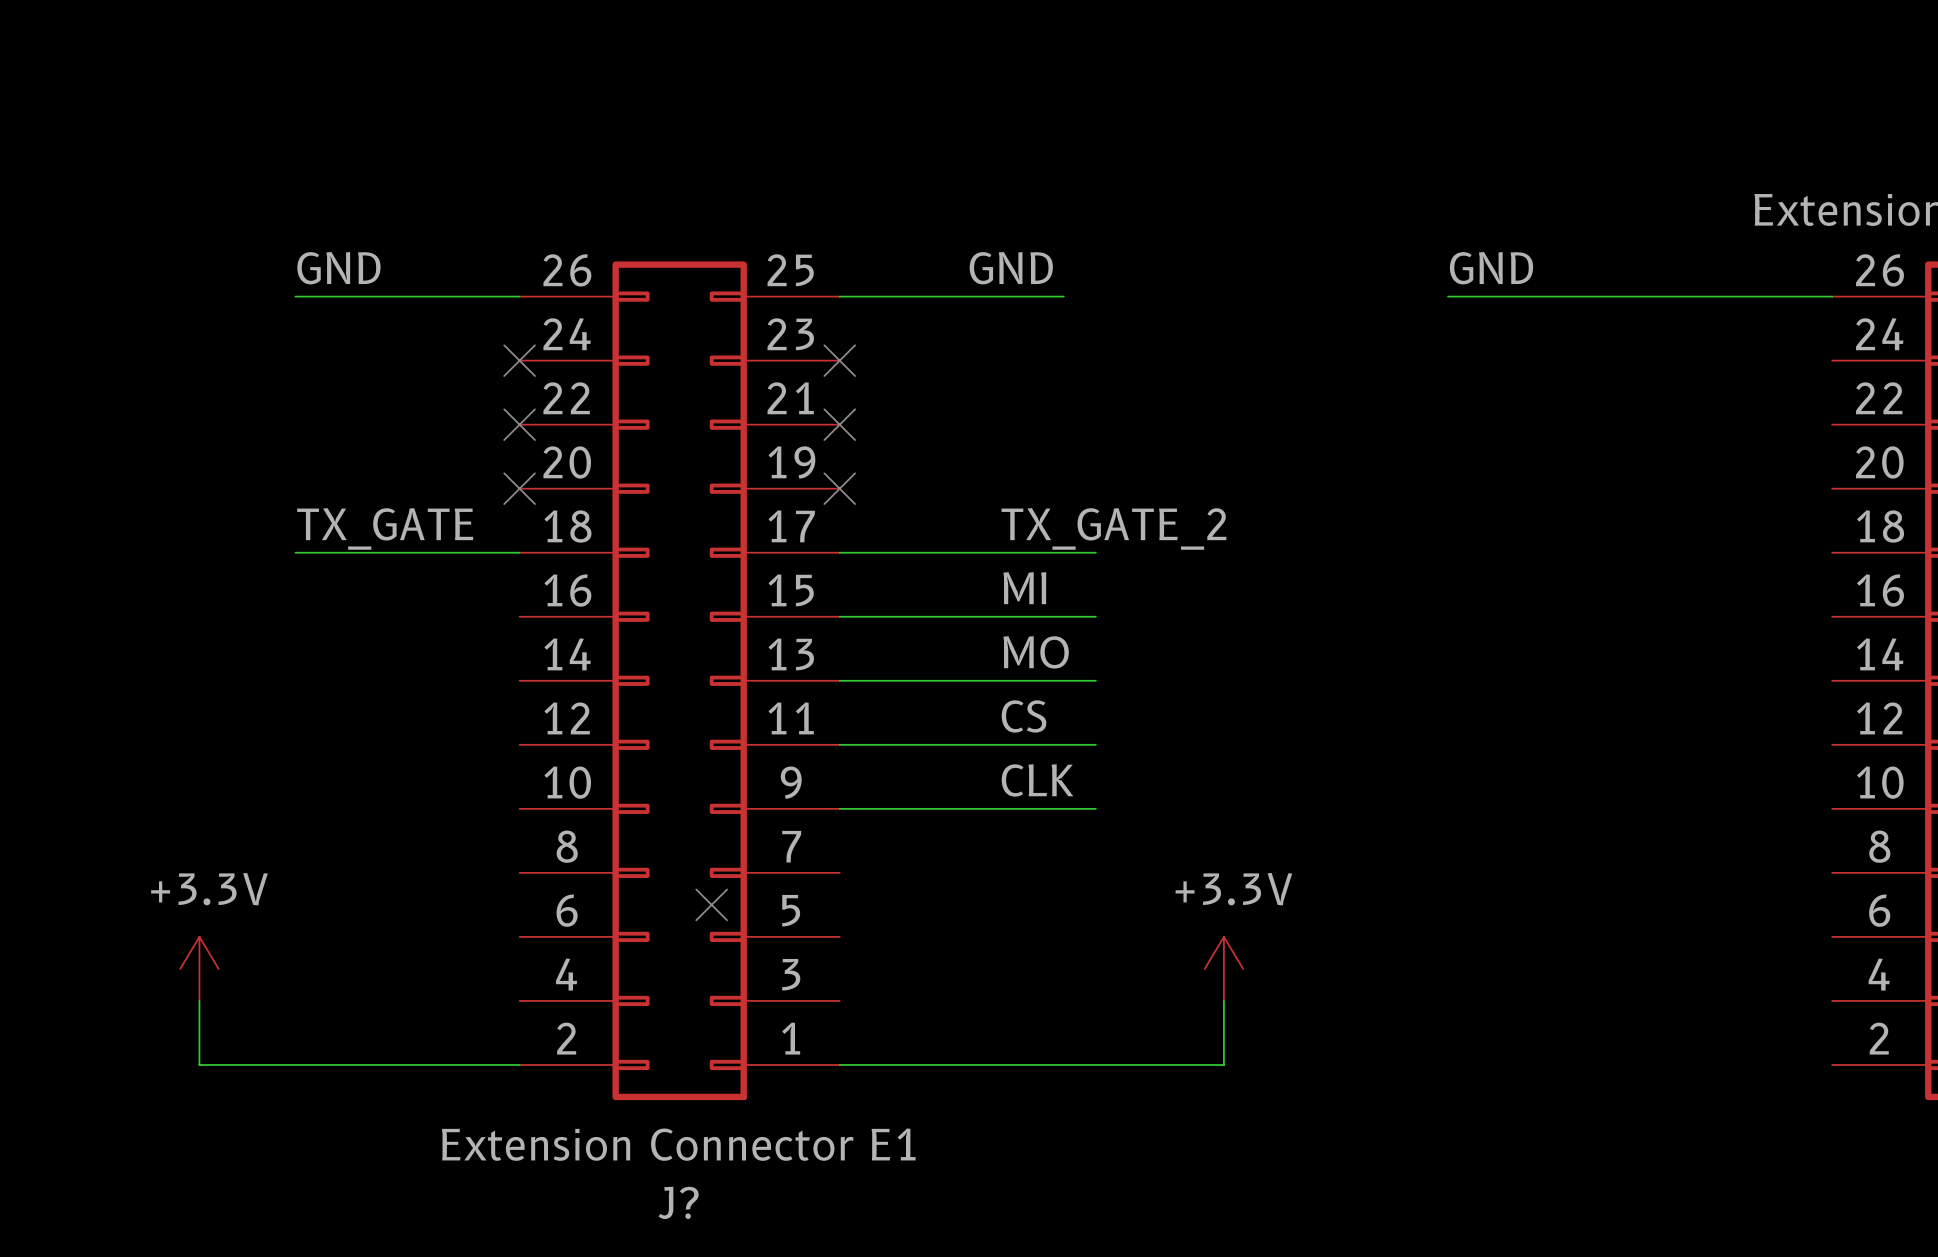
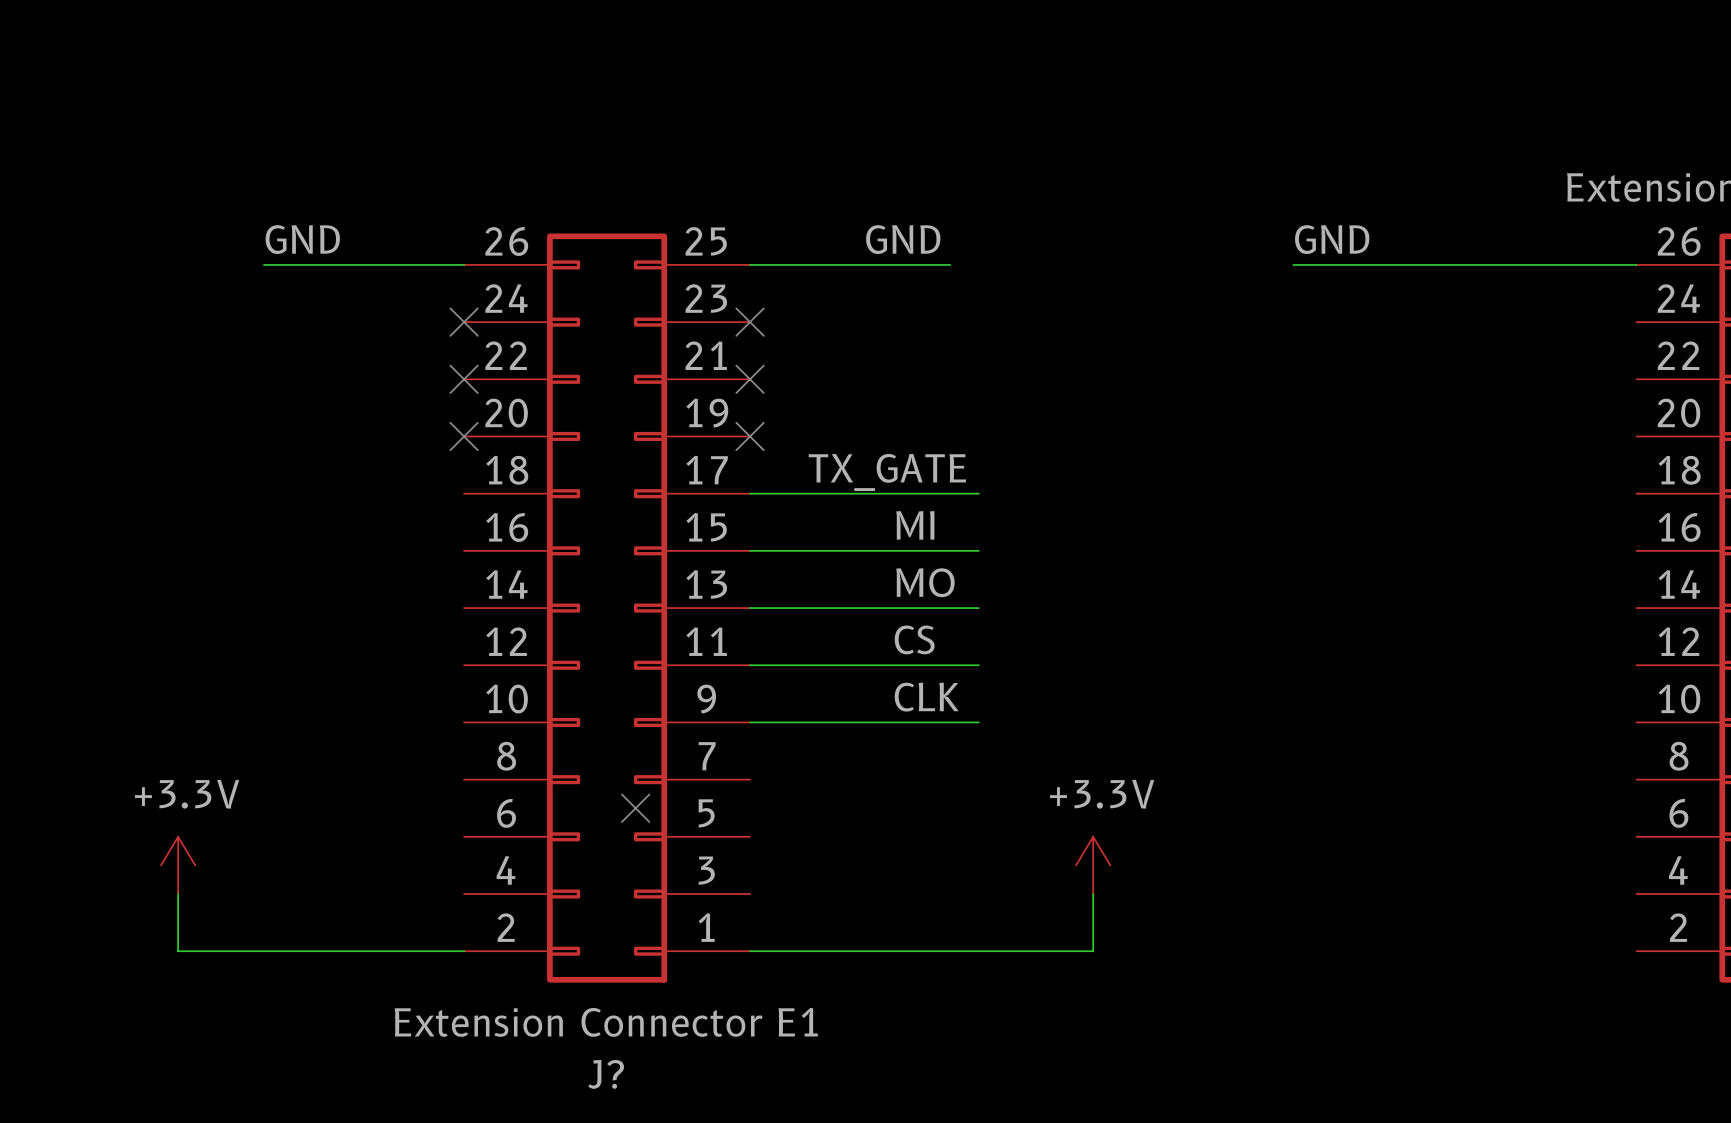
label position: TX_GATE (385, 528) -> TX_GATE (887, 472)
label: TX_GATE_2 (1113, 528) -> none
wire: (295, 552) (519, 552) -> none

